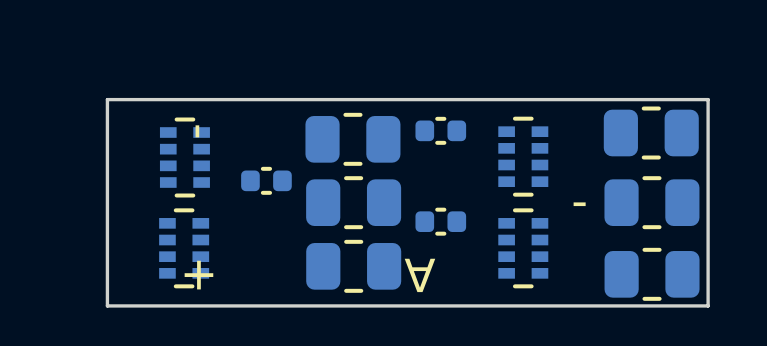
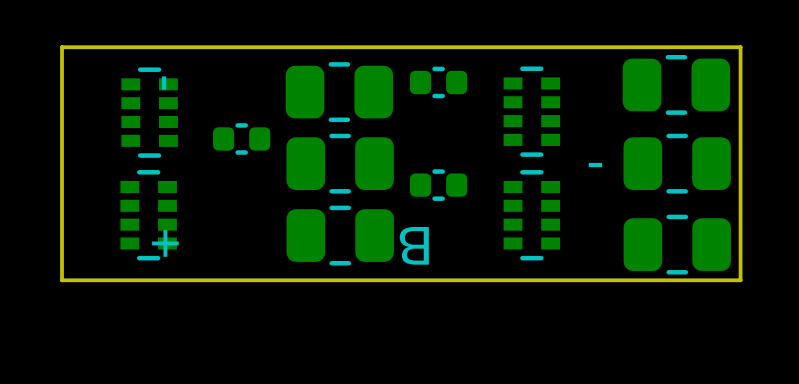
text: A (419, 275) -> B (414, 245)

